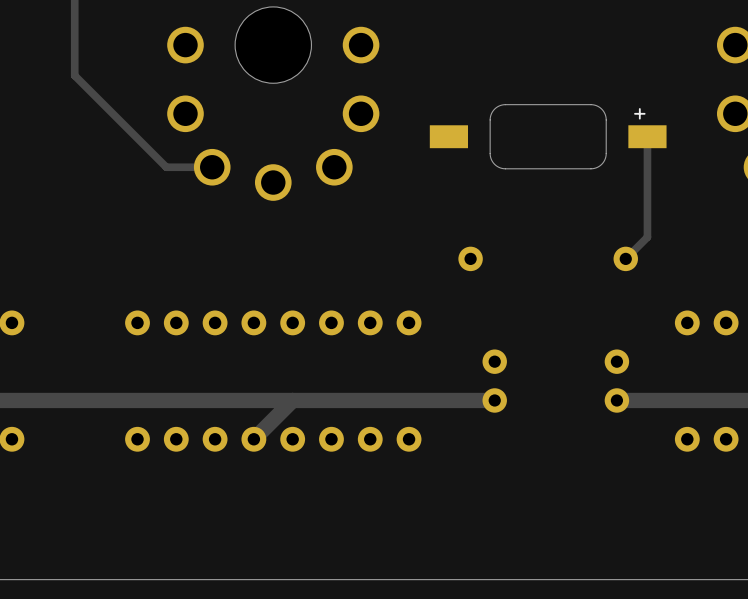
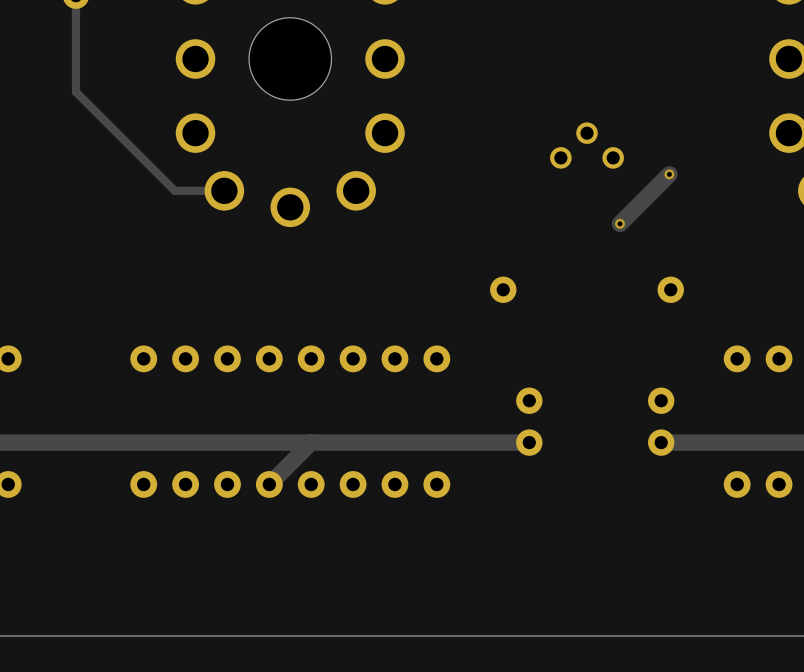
part footprint: [429, 104, 667, 170] -> [550, 122, 624, 169]
track: (647, 136) (647, 237) (625, 258) -> none
track: none -> (669, 174) (619, 223)
via: none -> (669, 174)
via: none -> (619, 223)

